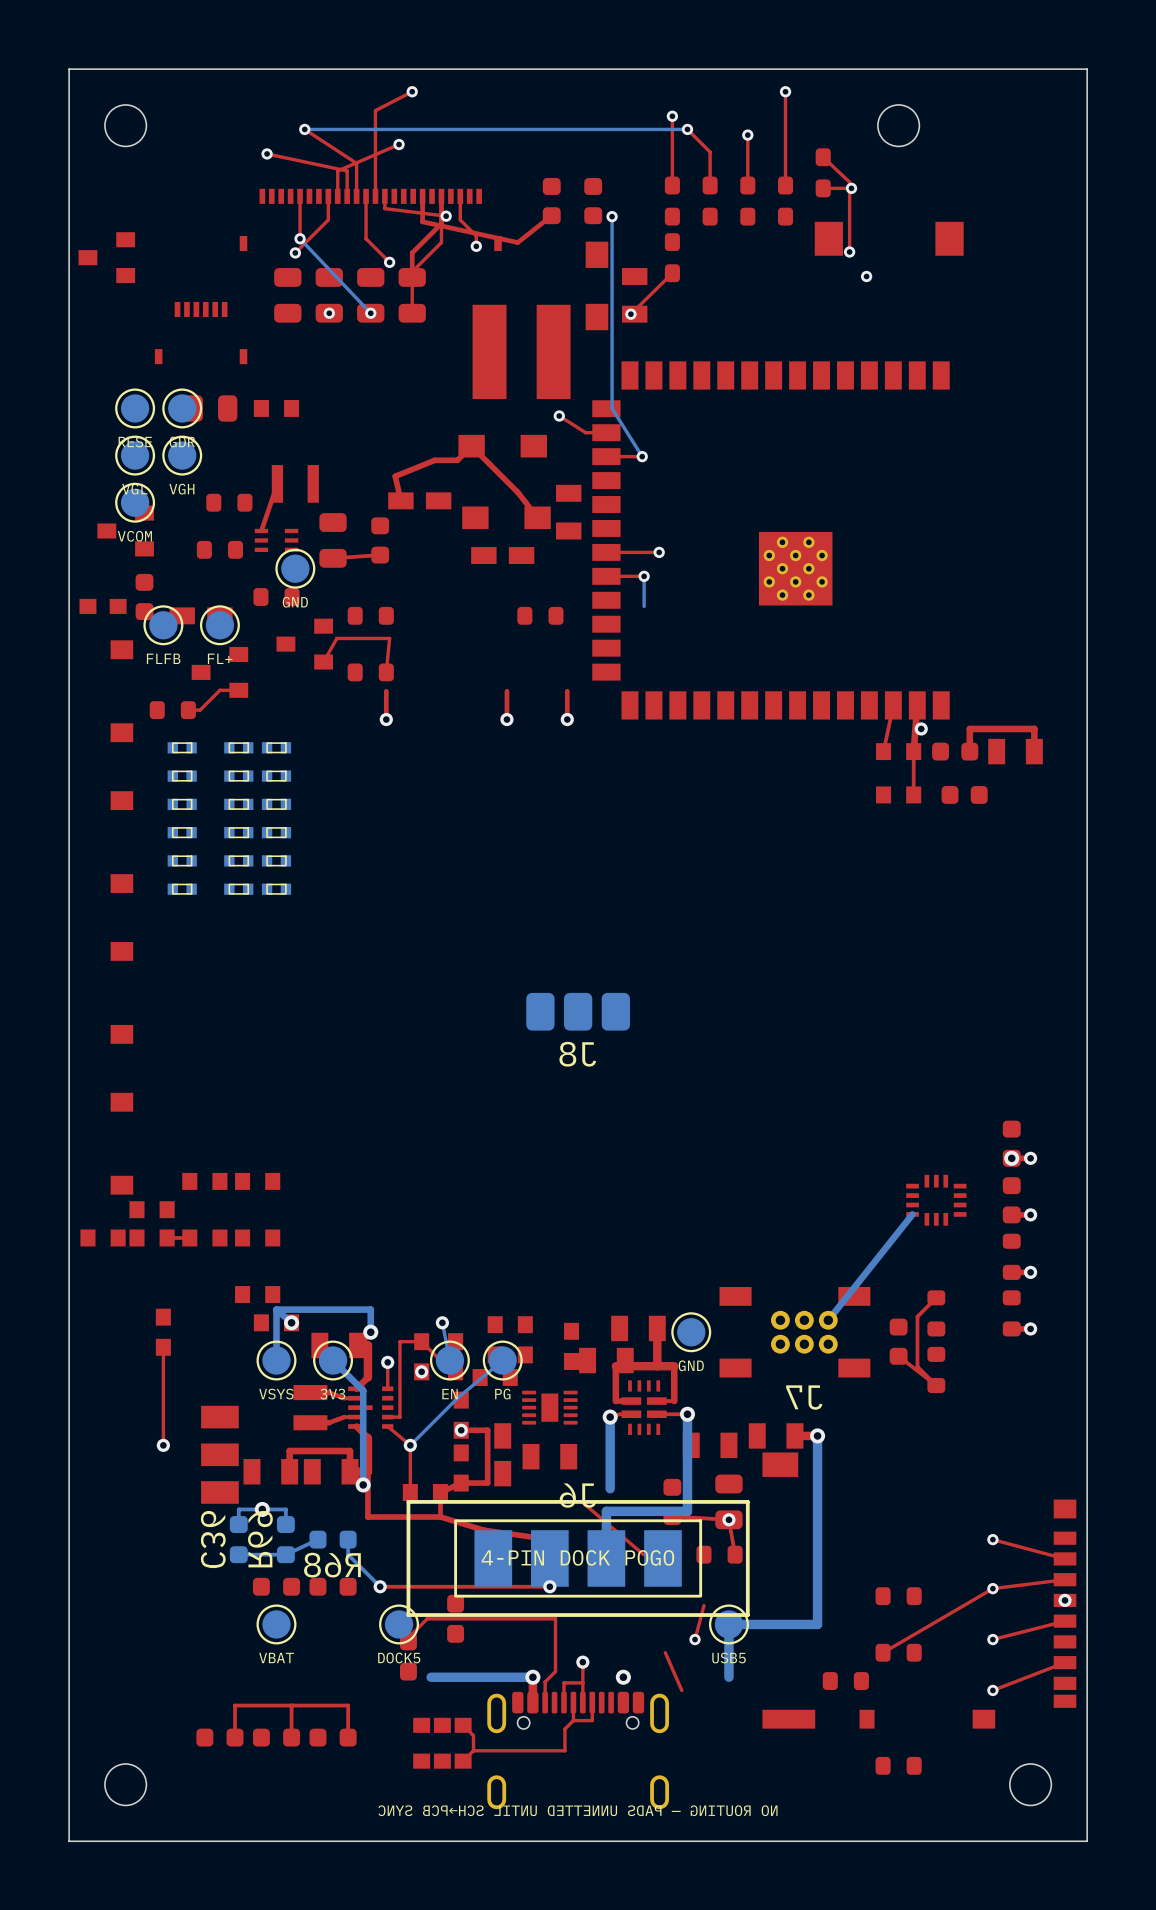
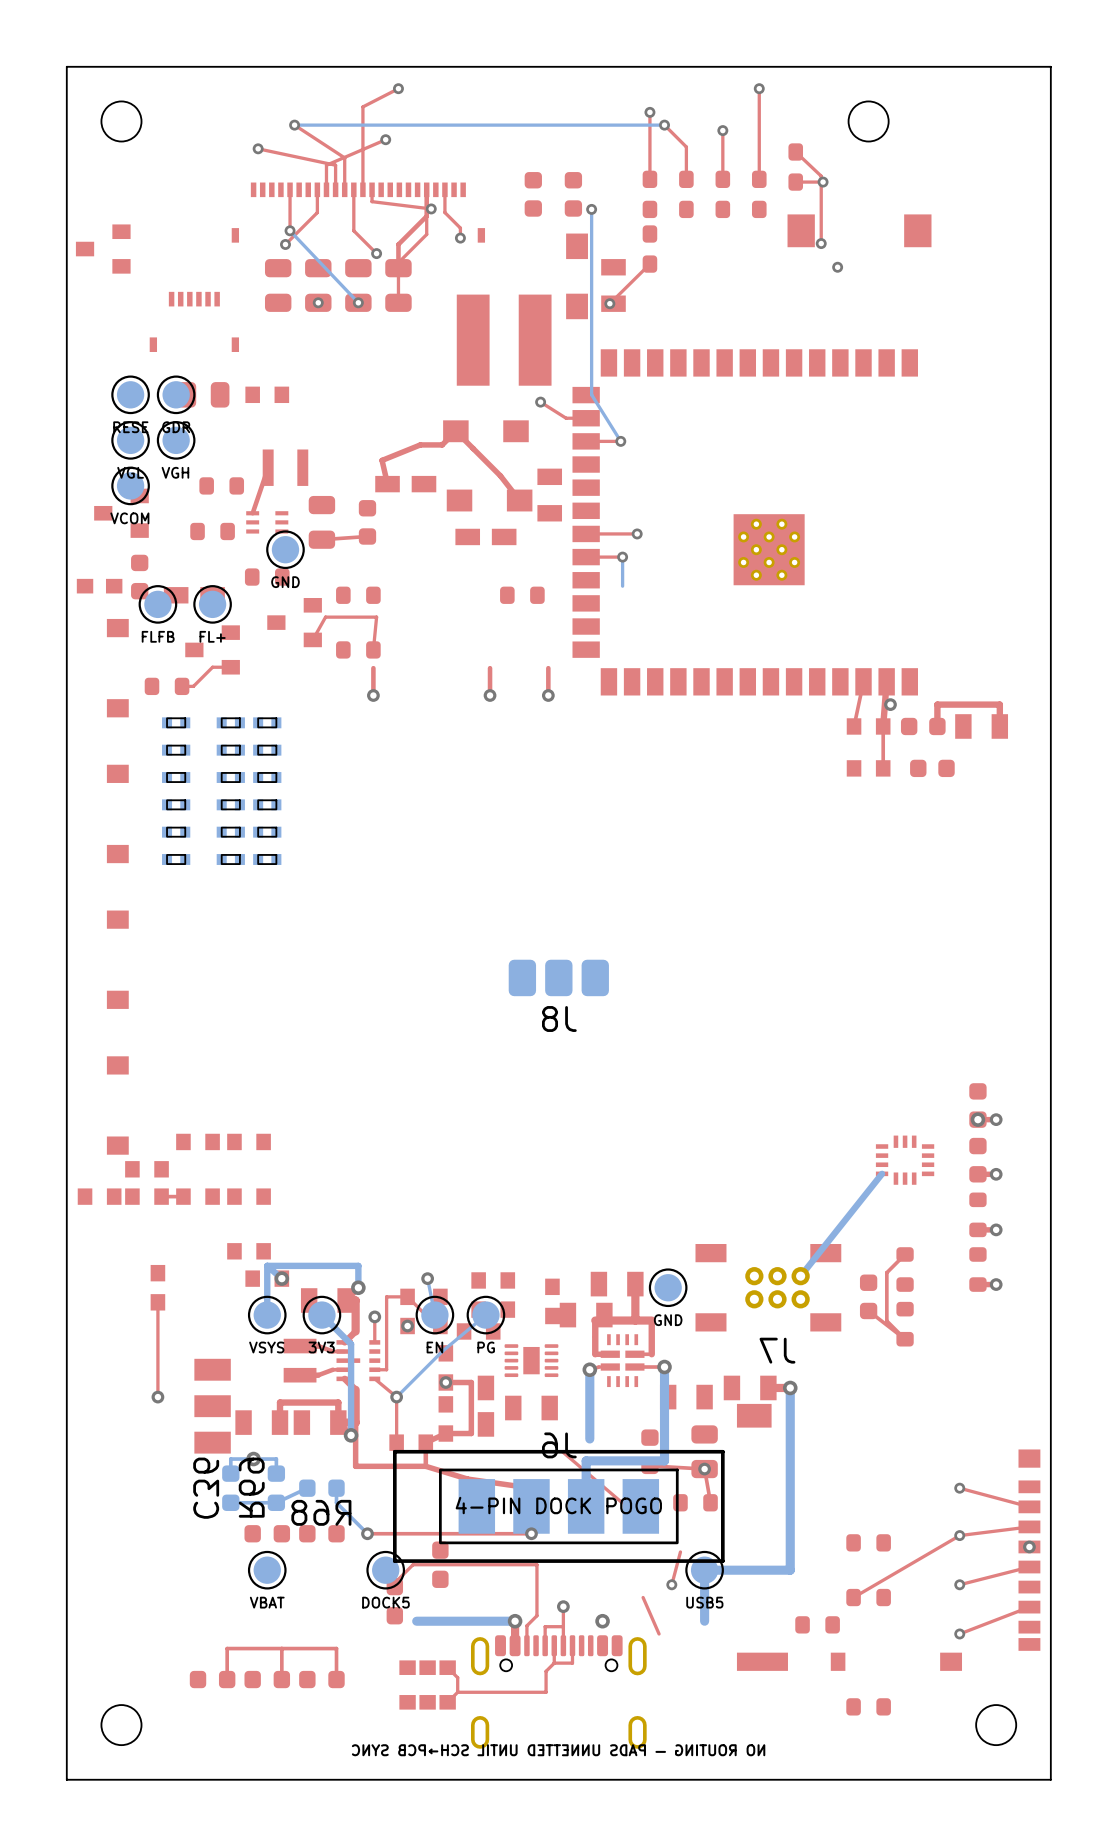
top track: (422, 196) (422, 221) (517, 242) (551, 215) -> none

